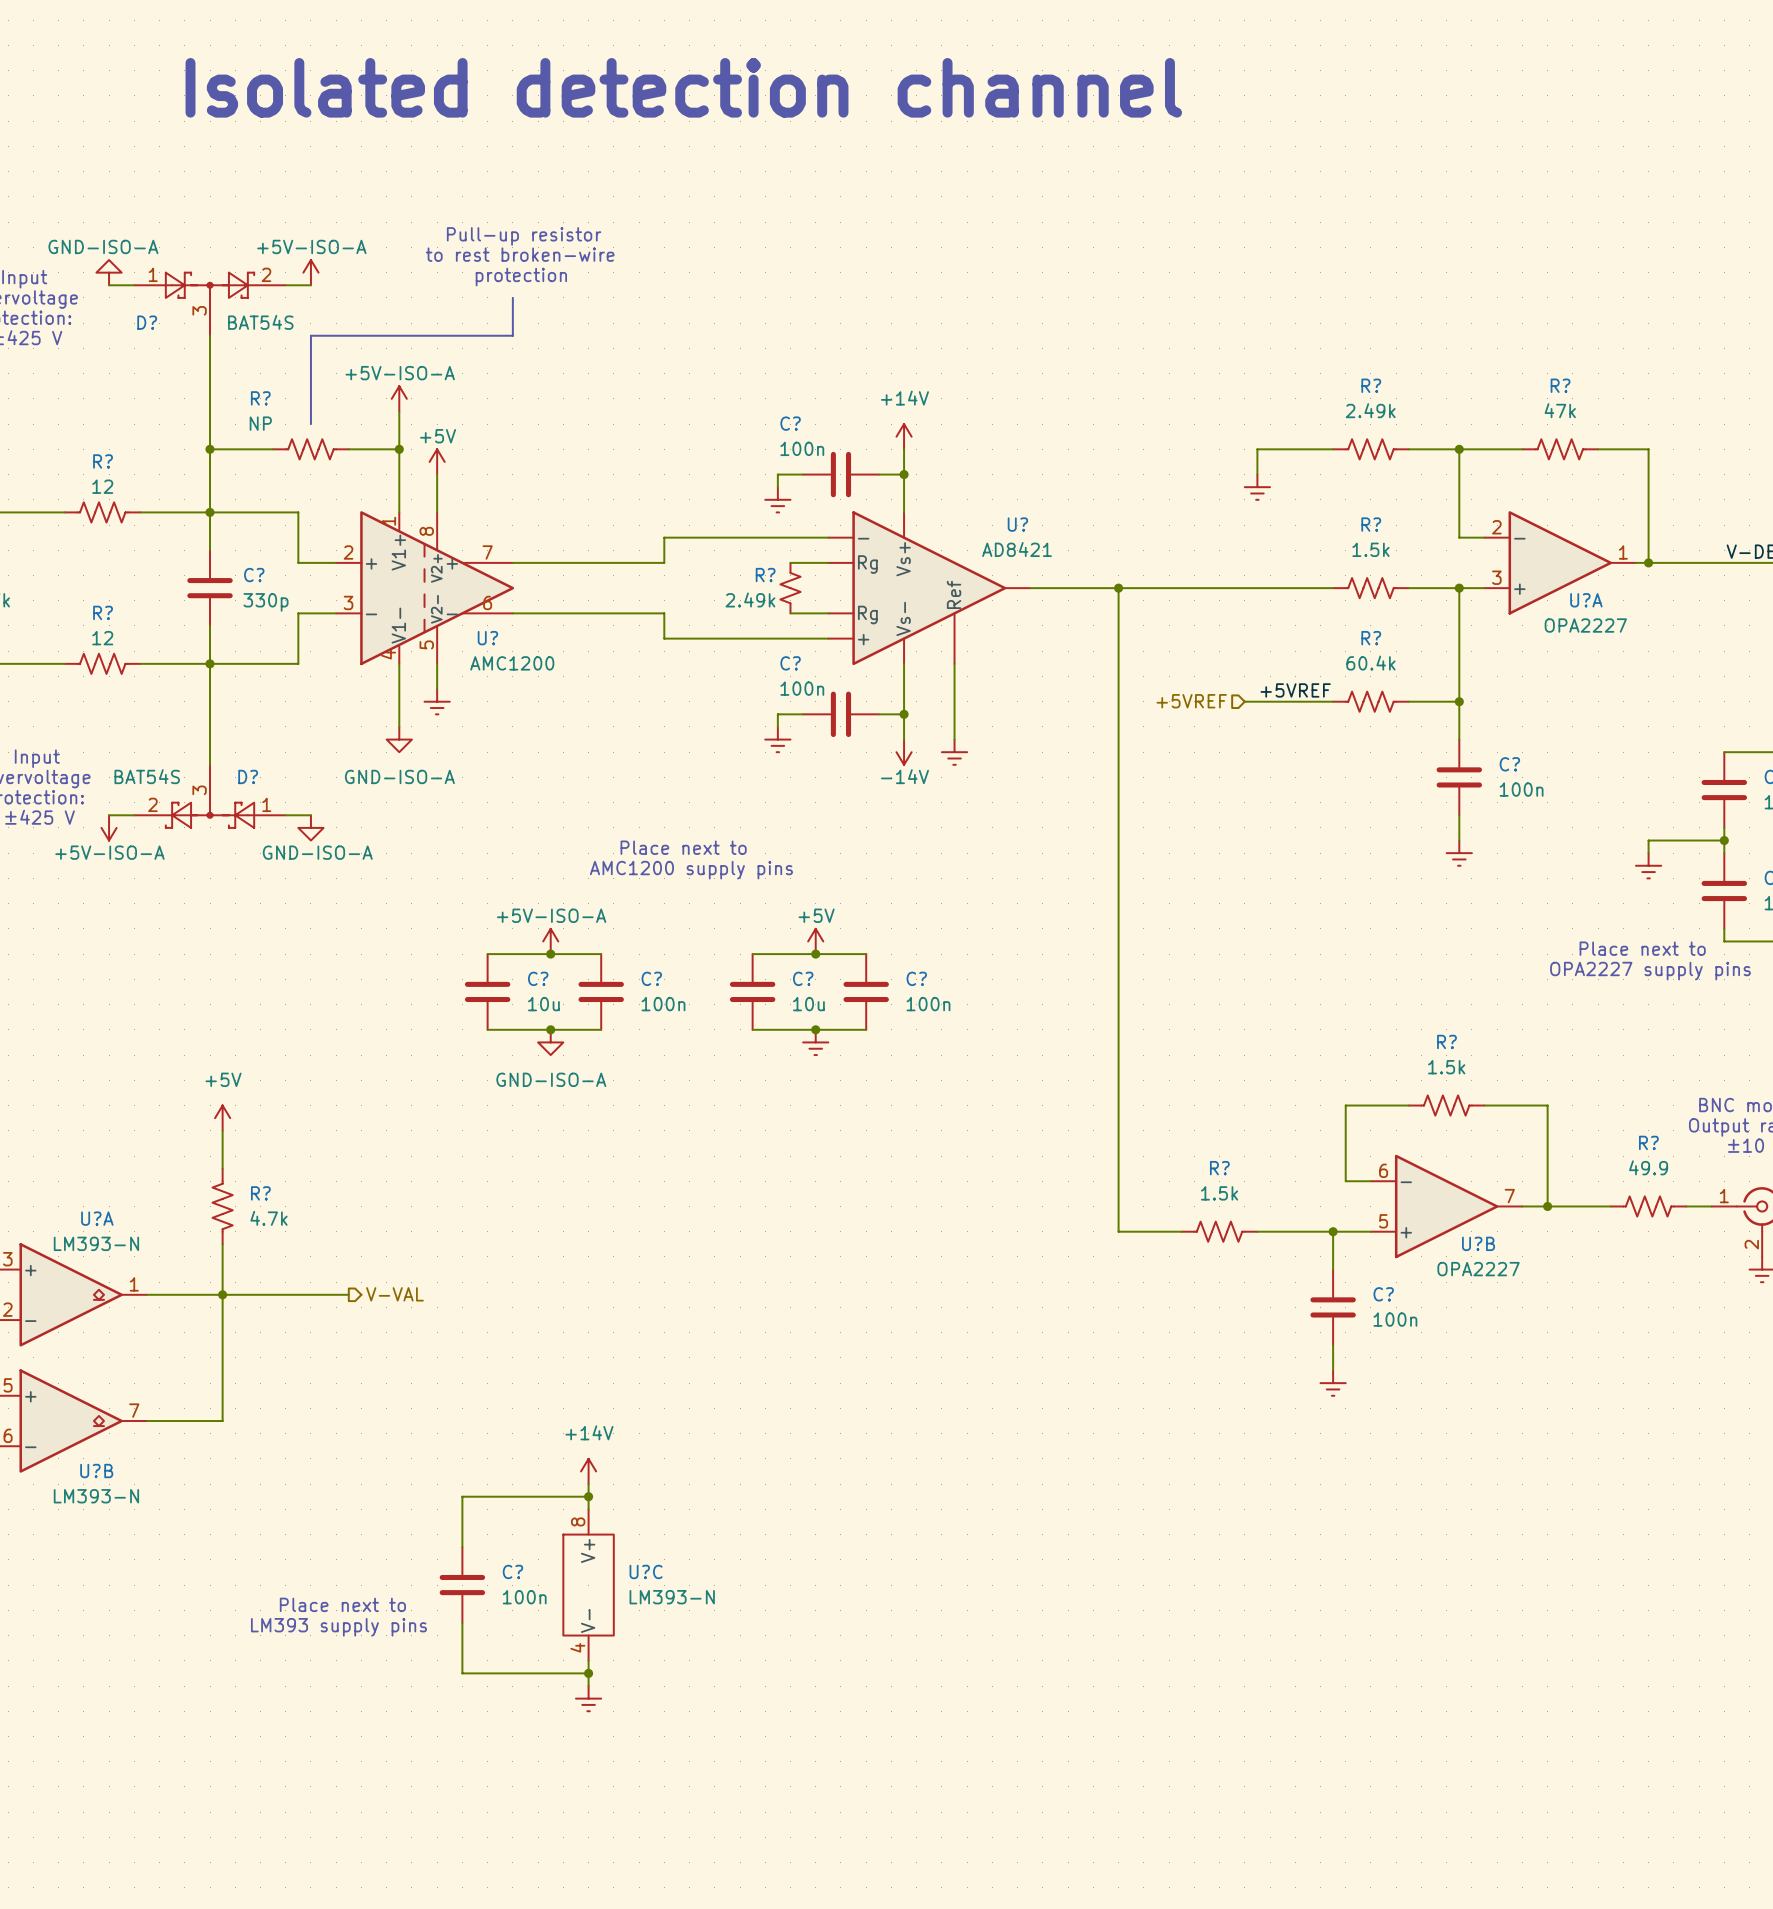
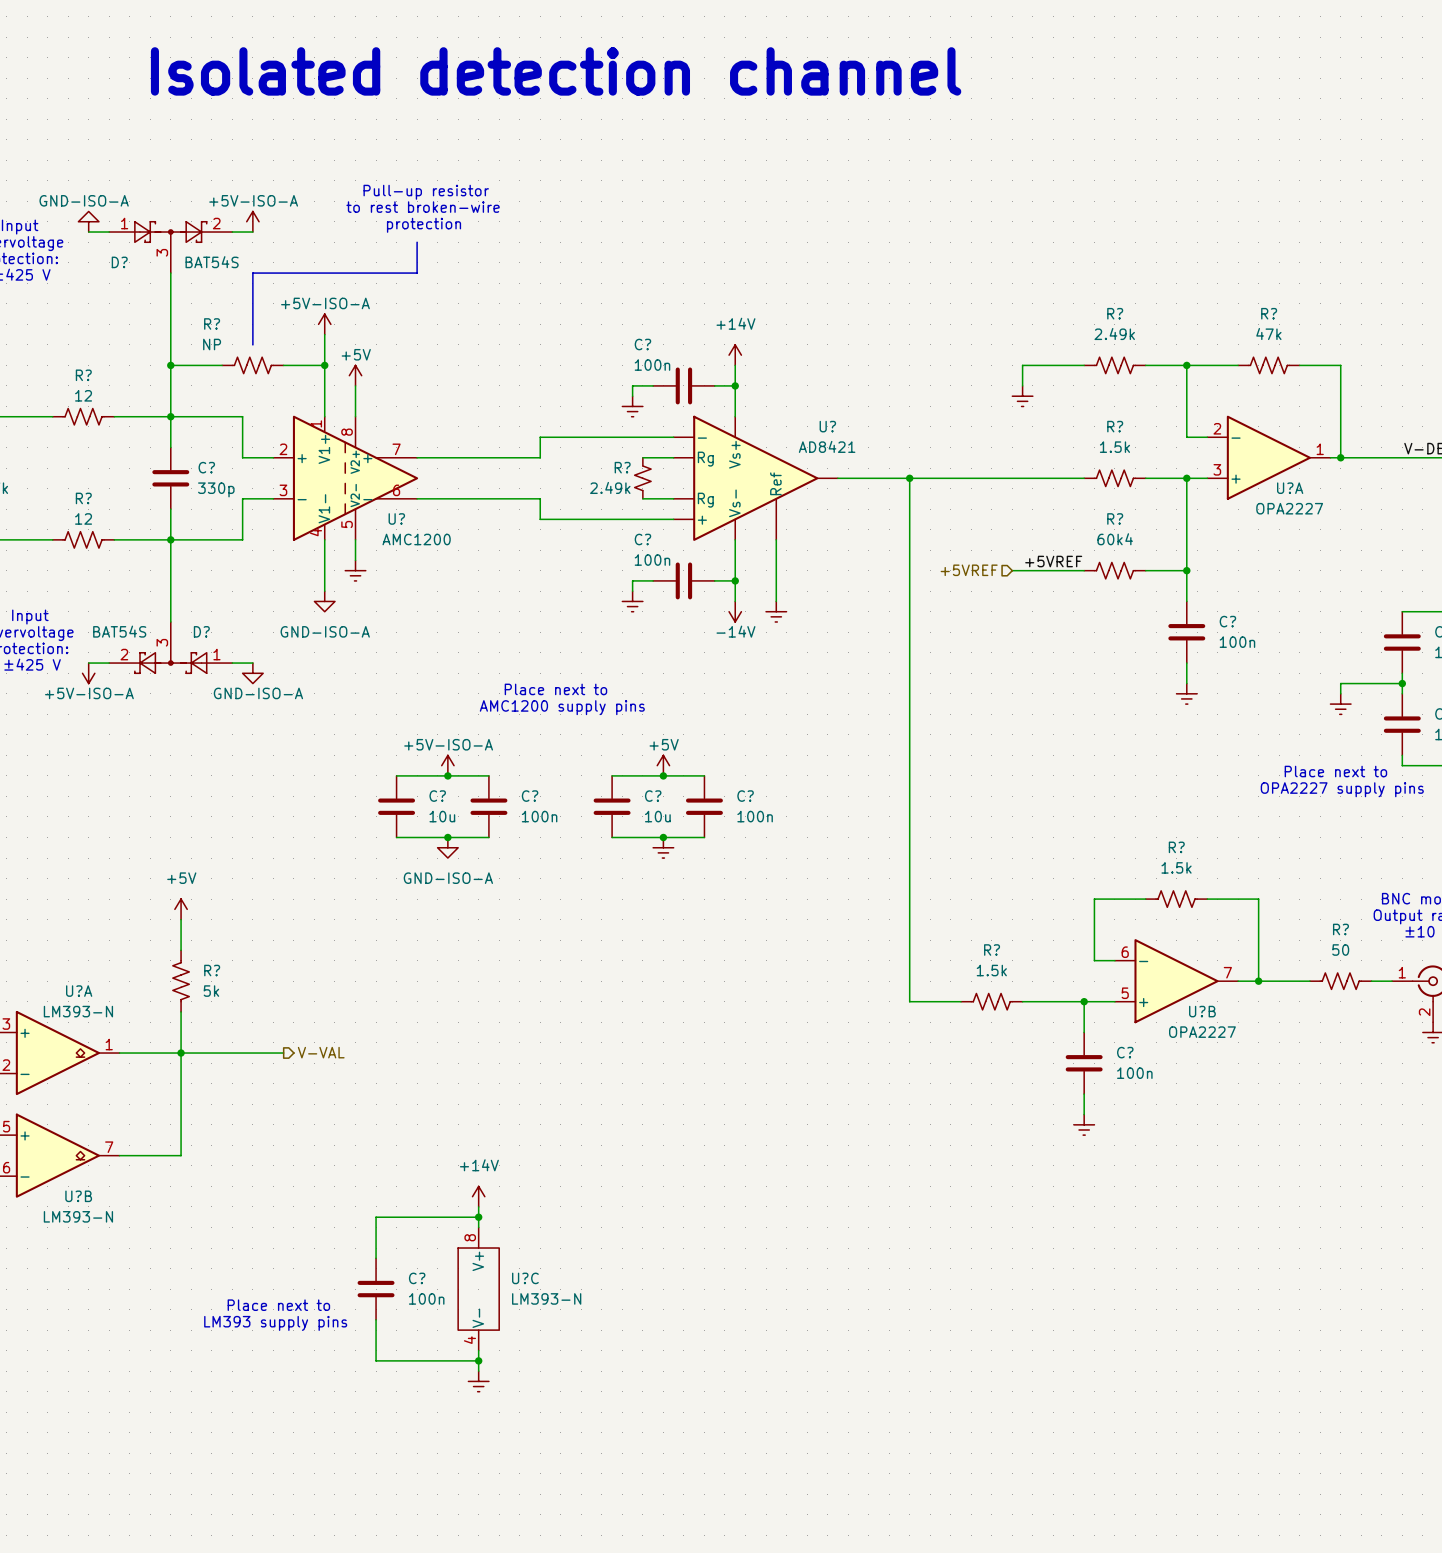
R? value: 60.4k (1370, 663) -> 60k4 (1115, 539)
R? value: 49.9 (1648, 1167) -> 50 (1340, 950)
R? value: 4.7k (268, 1218) -> 5k (211, 991)

